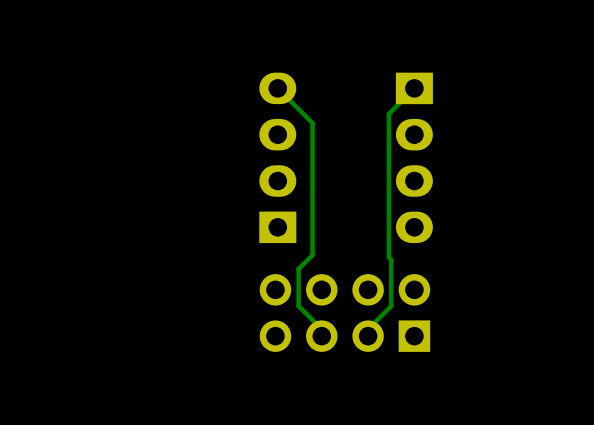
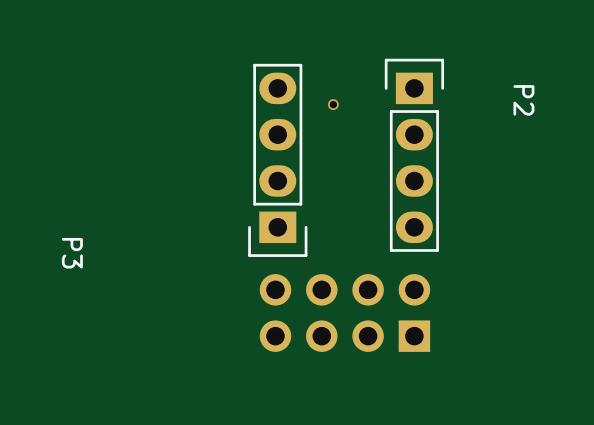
track: (277, 88) (312, 123) (312, 255) (298, 269) (298, 306) (321, 329) -> none
track: (414, 88) (388, 113) (388, 257) (391, 259) (391, 306) (368, 329) -> none
via: none -> (333, 104)
P3 side: top (277, 157) -> bottom (277, 160)
P2 side: top (414, 157) -> bottom (414, 155)

